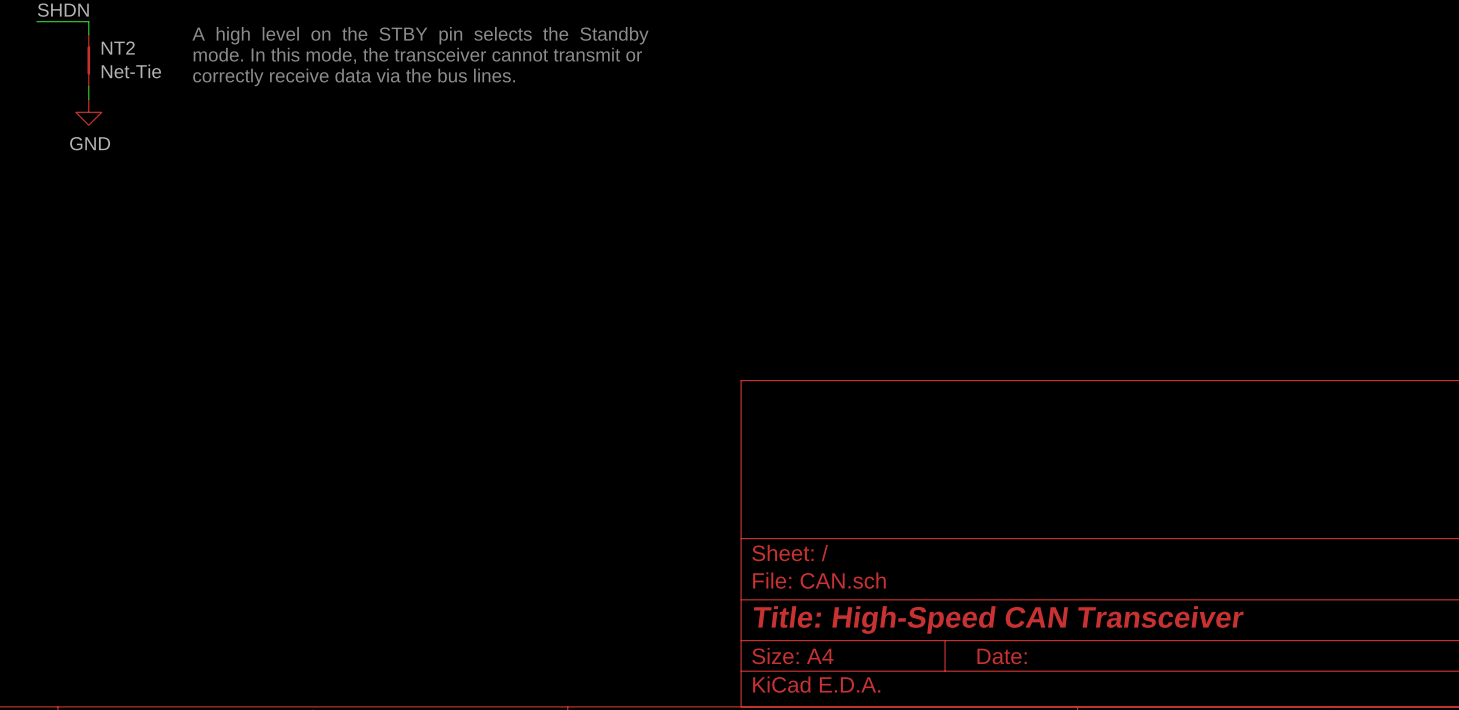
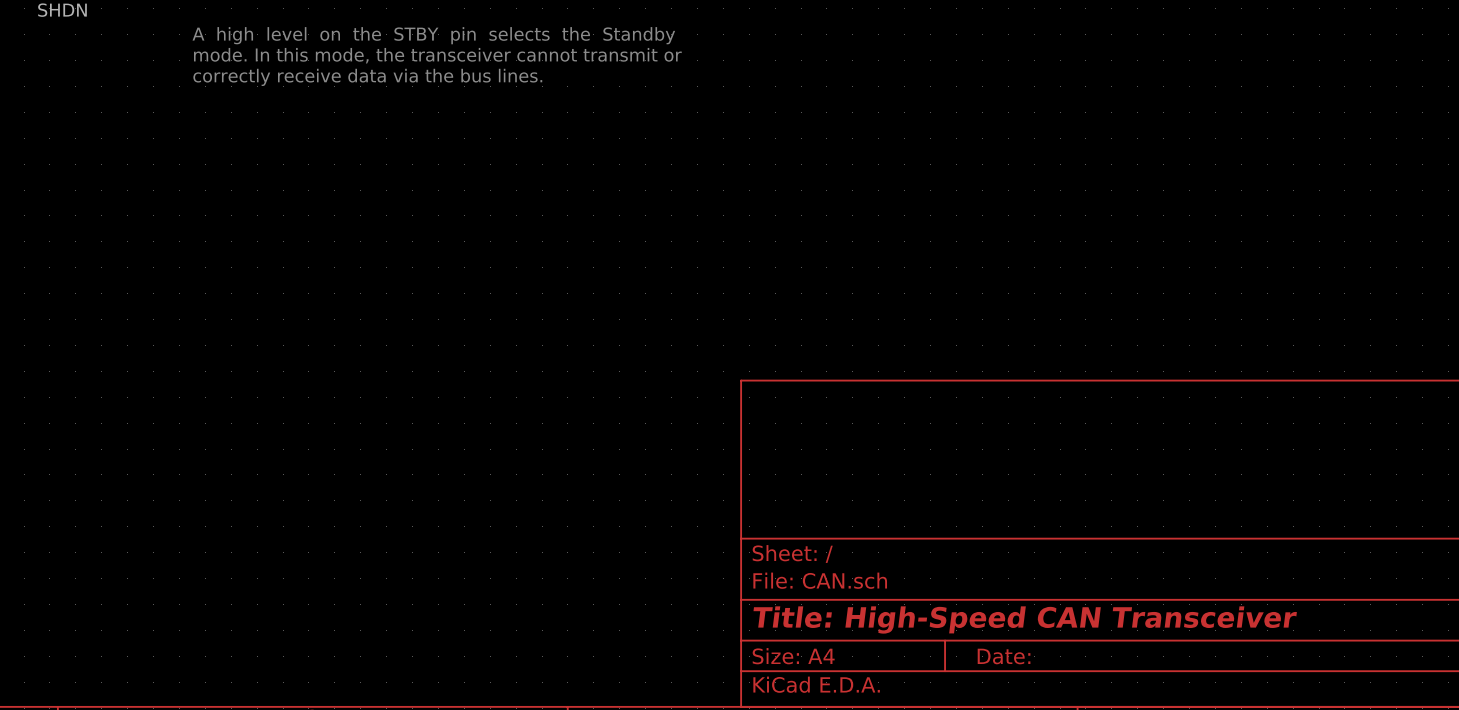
wire: (36, 21) (88, 21) (88, 34) -> none
NT2: Net-Tie (88, 60) -> none
wire: (88, 86) (88, 99) -> none
power symbol: GND (88, 112) -> none

